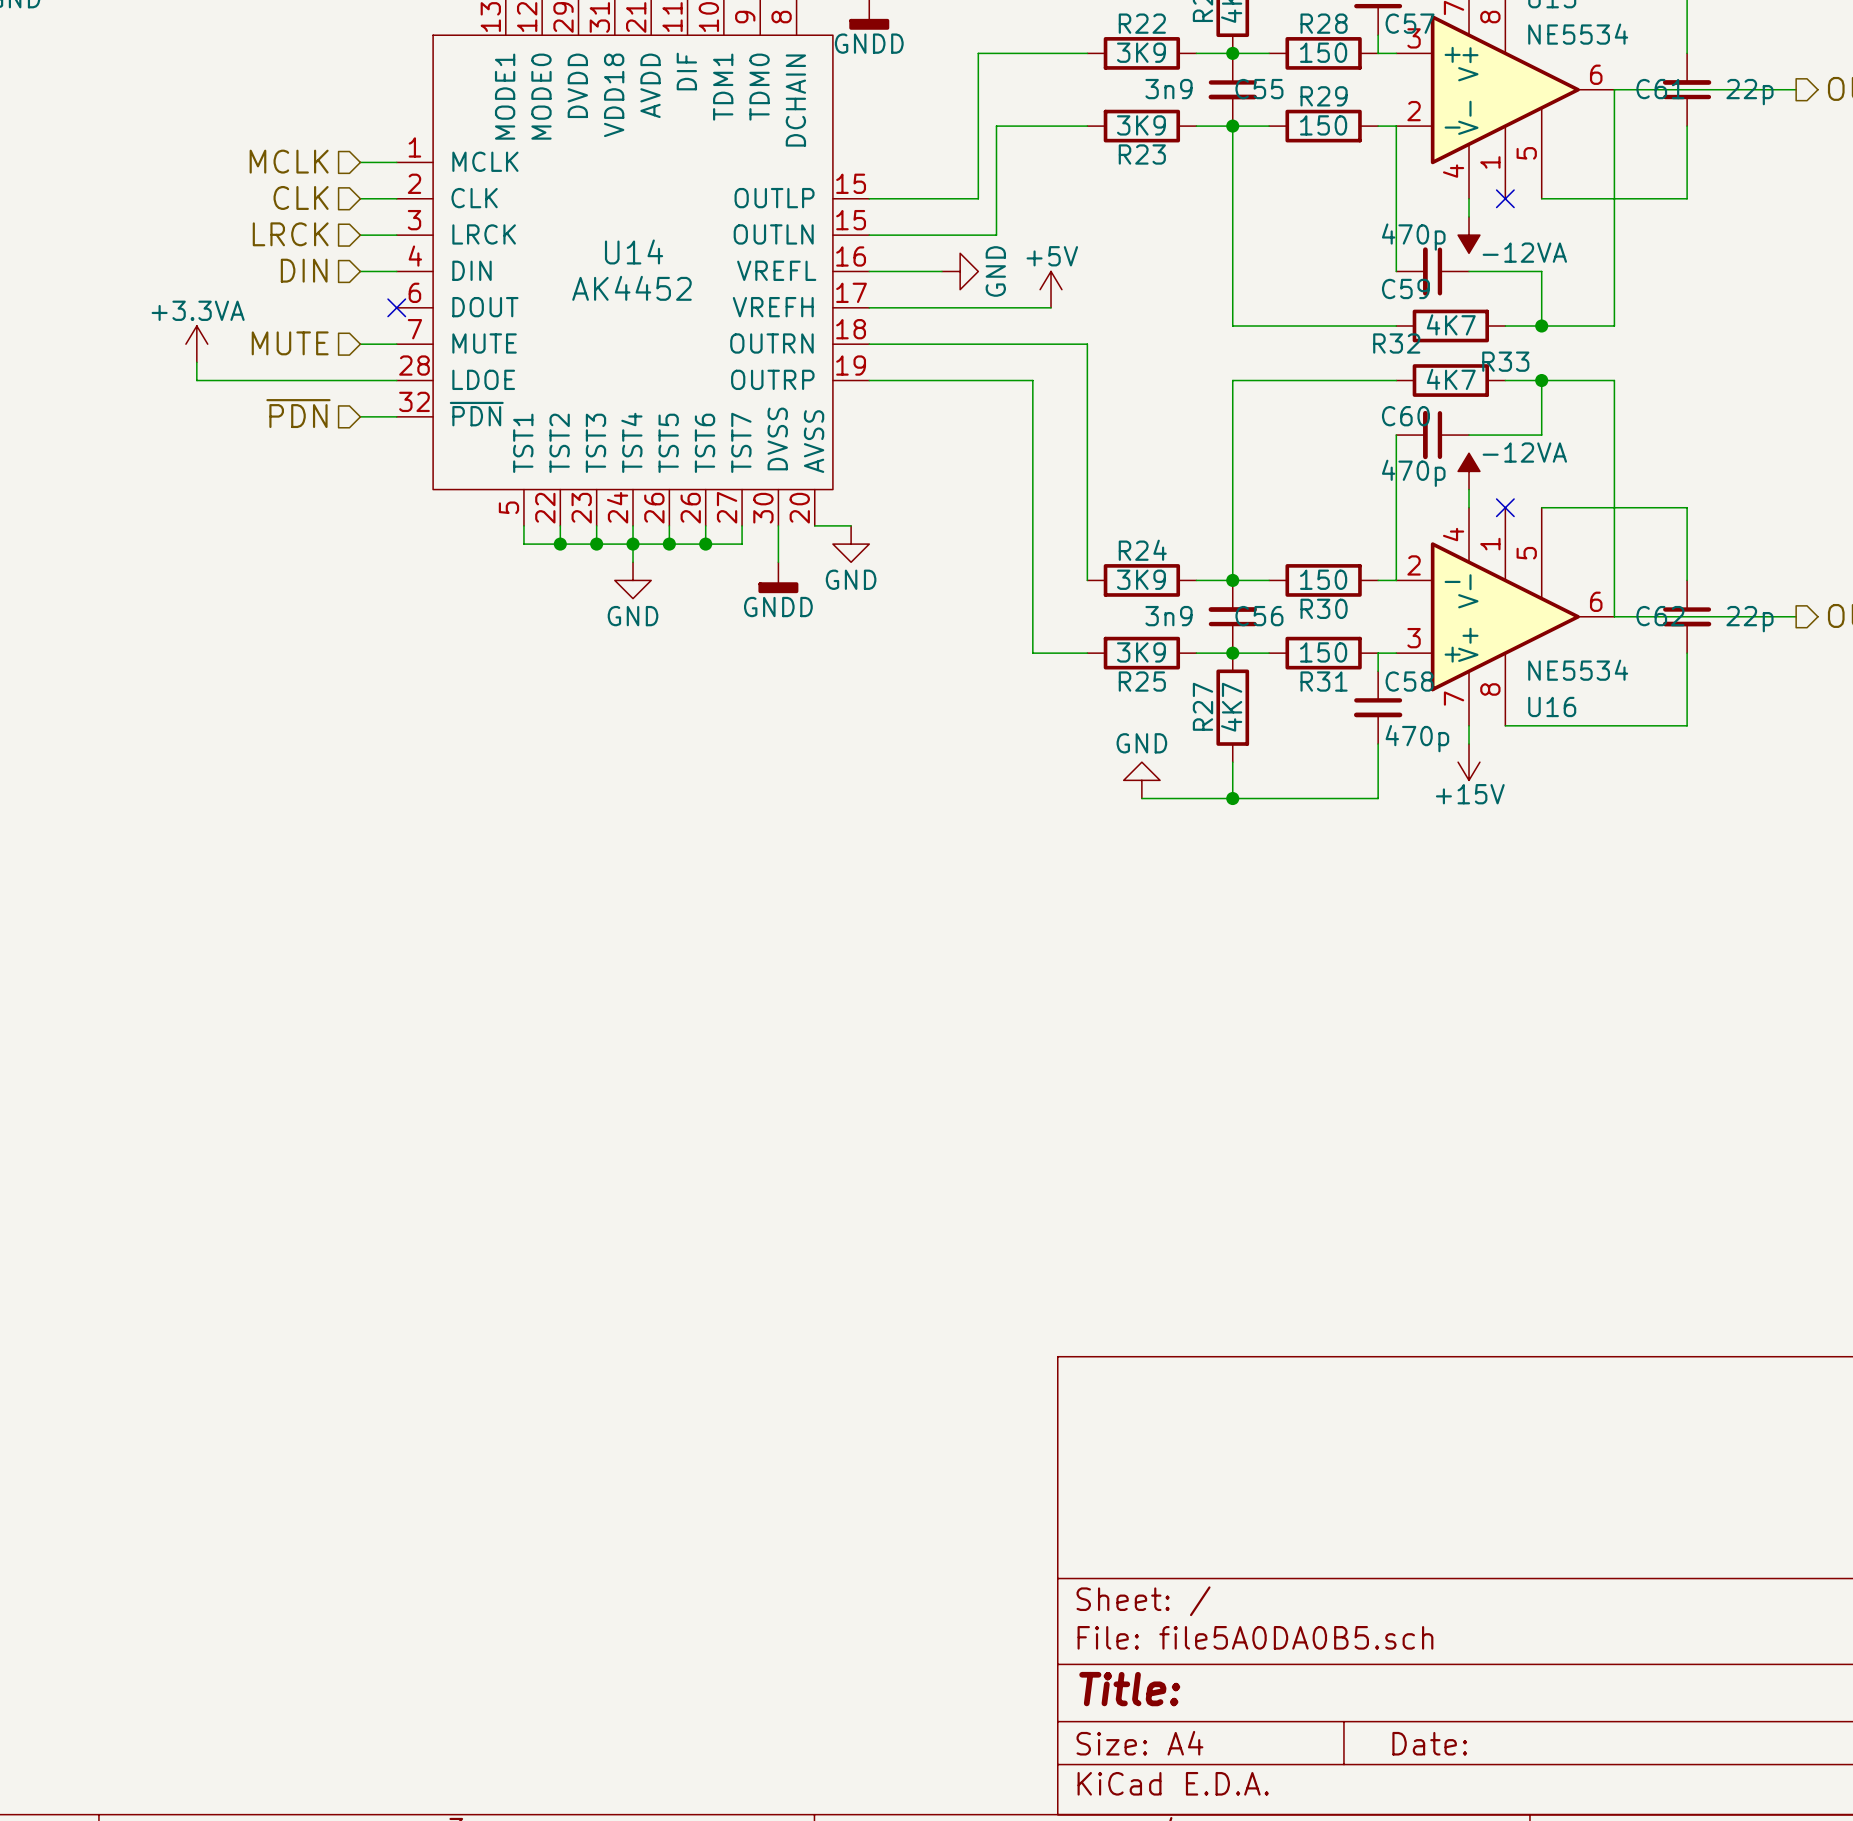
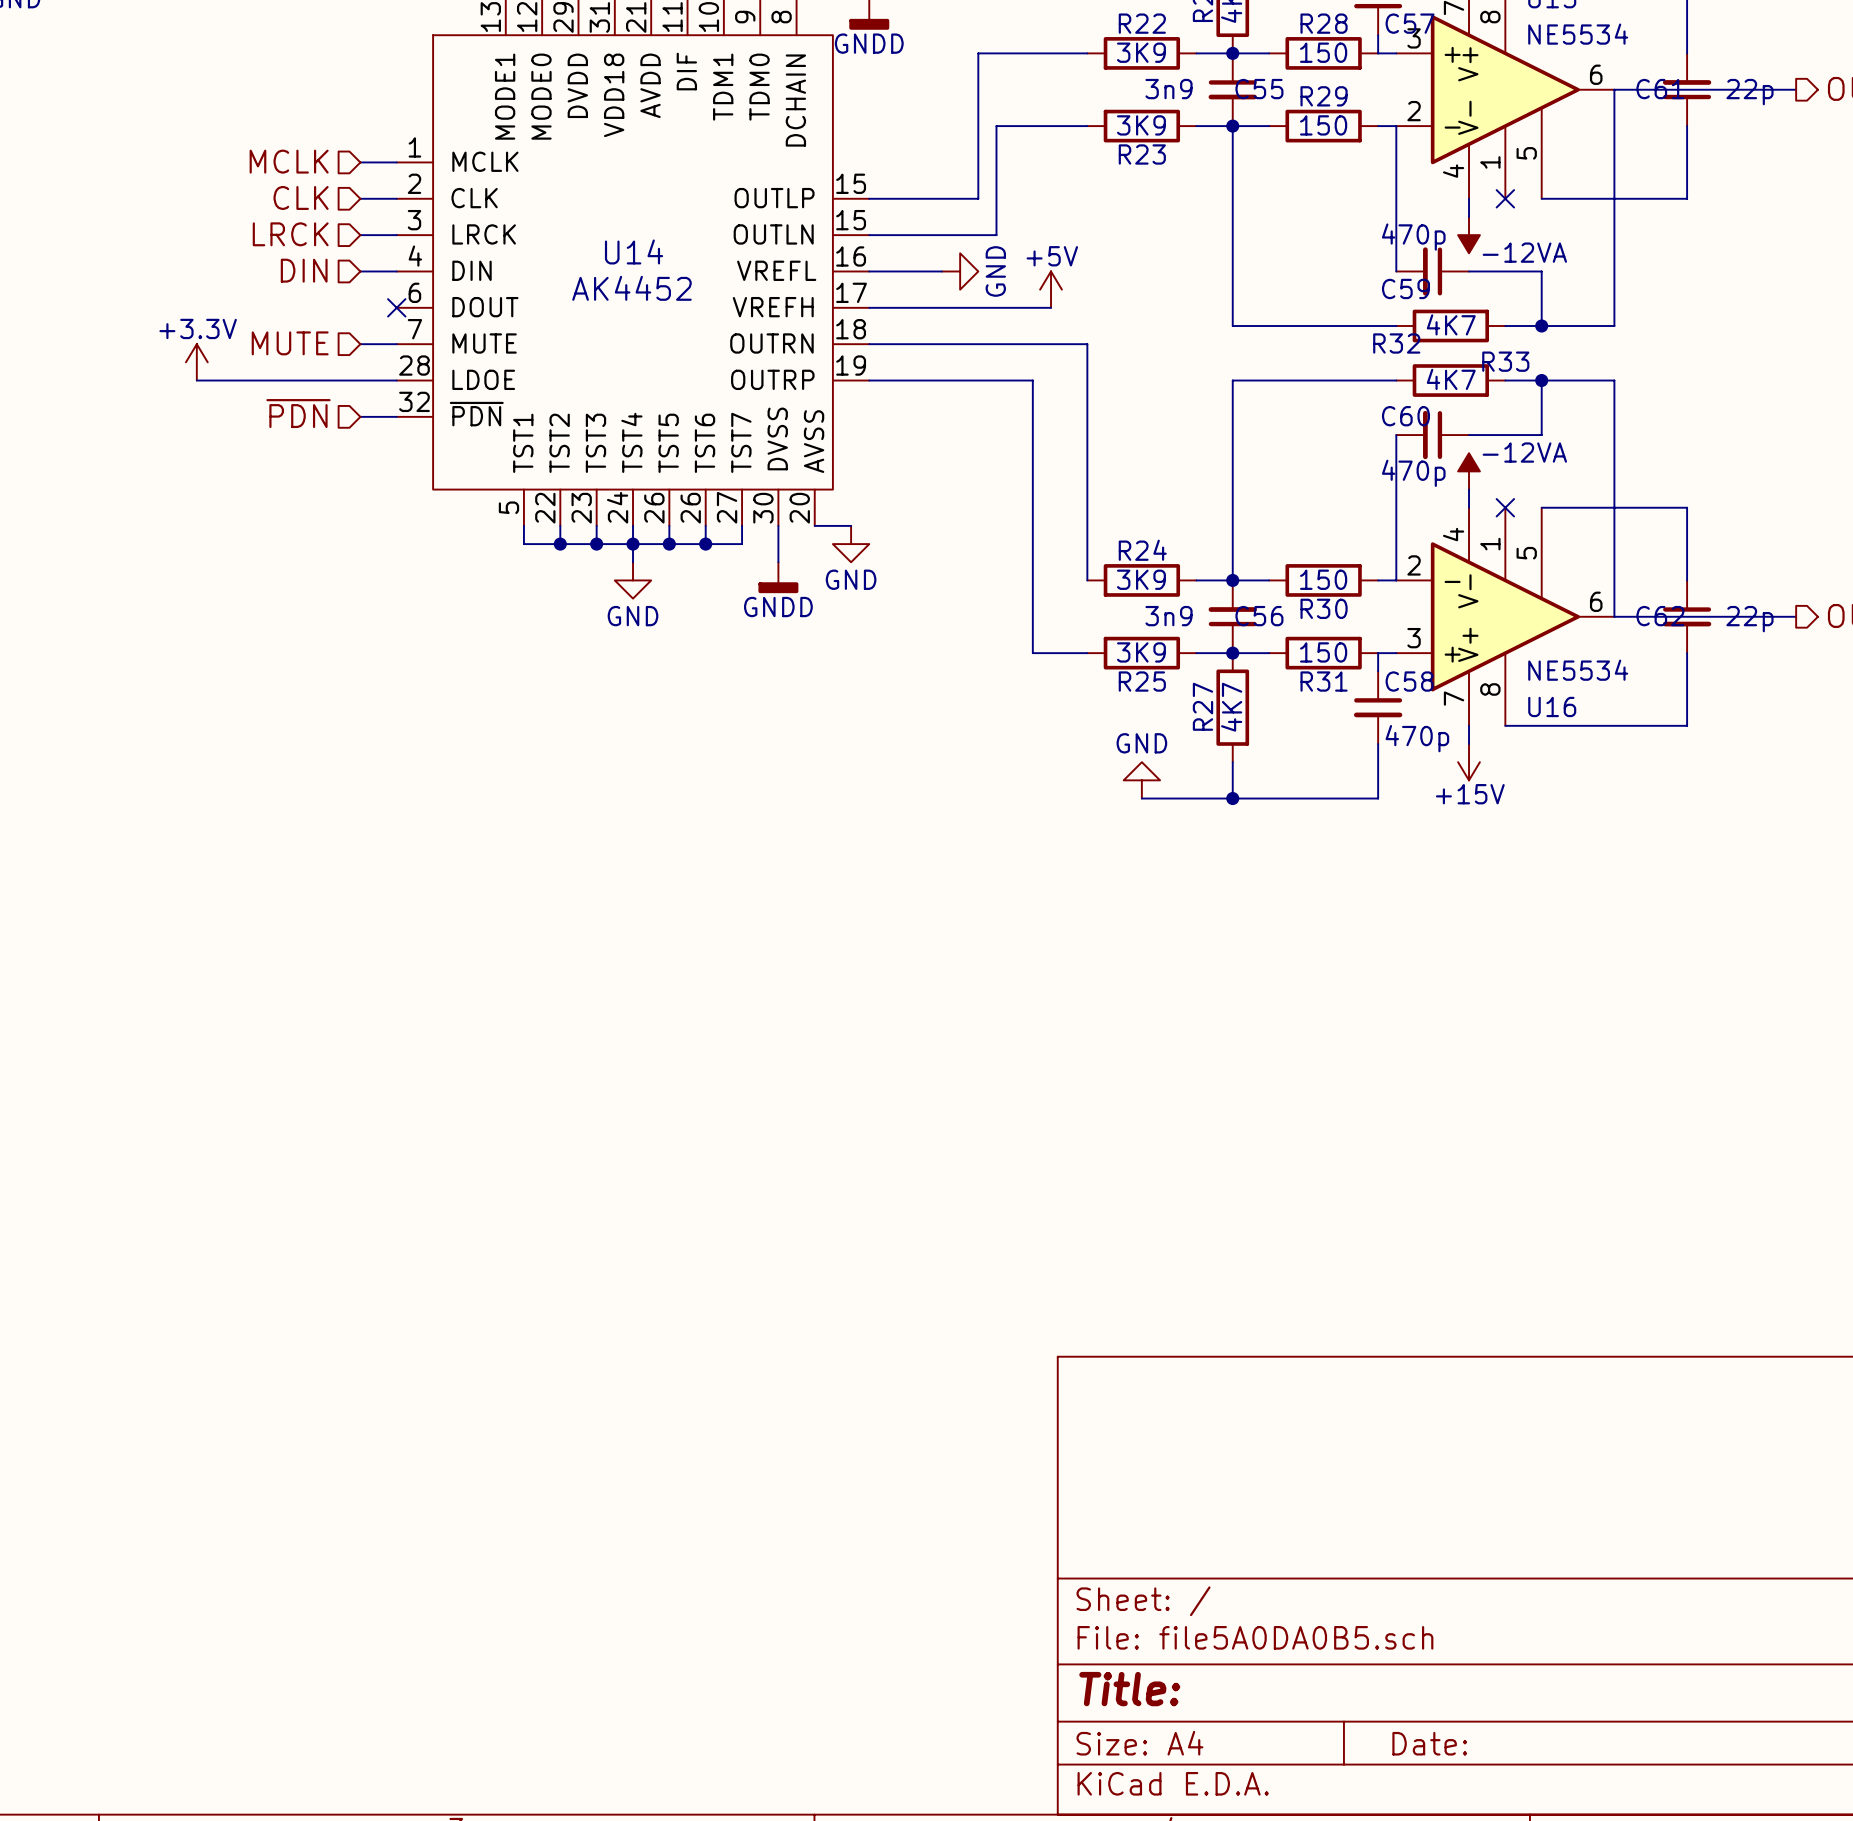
power symbol: +3.3VA (196, 344) -> none
power symbol: none -> +3.3V (196, 362)

